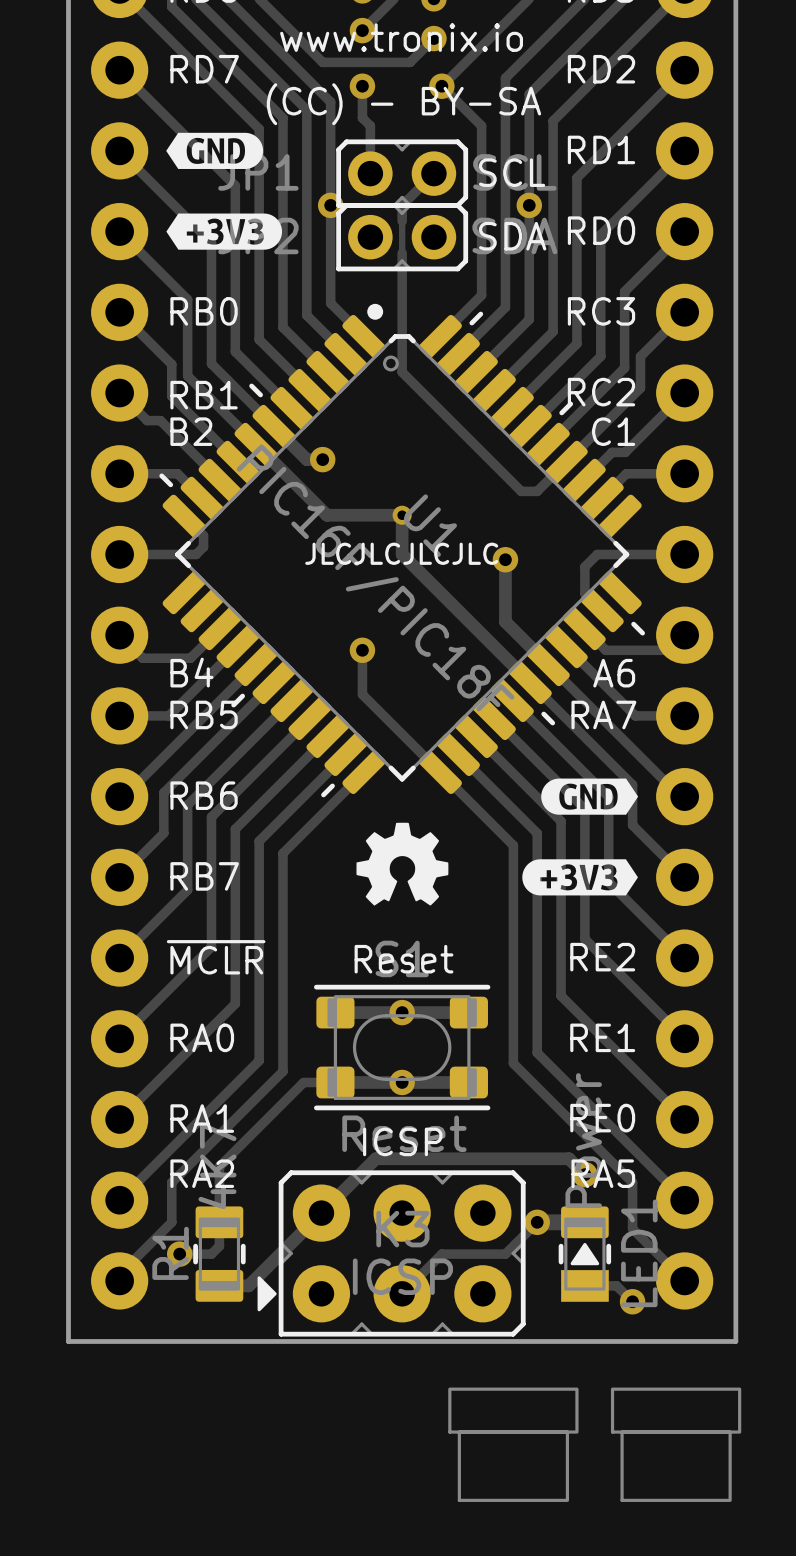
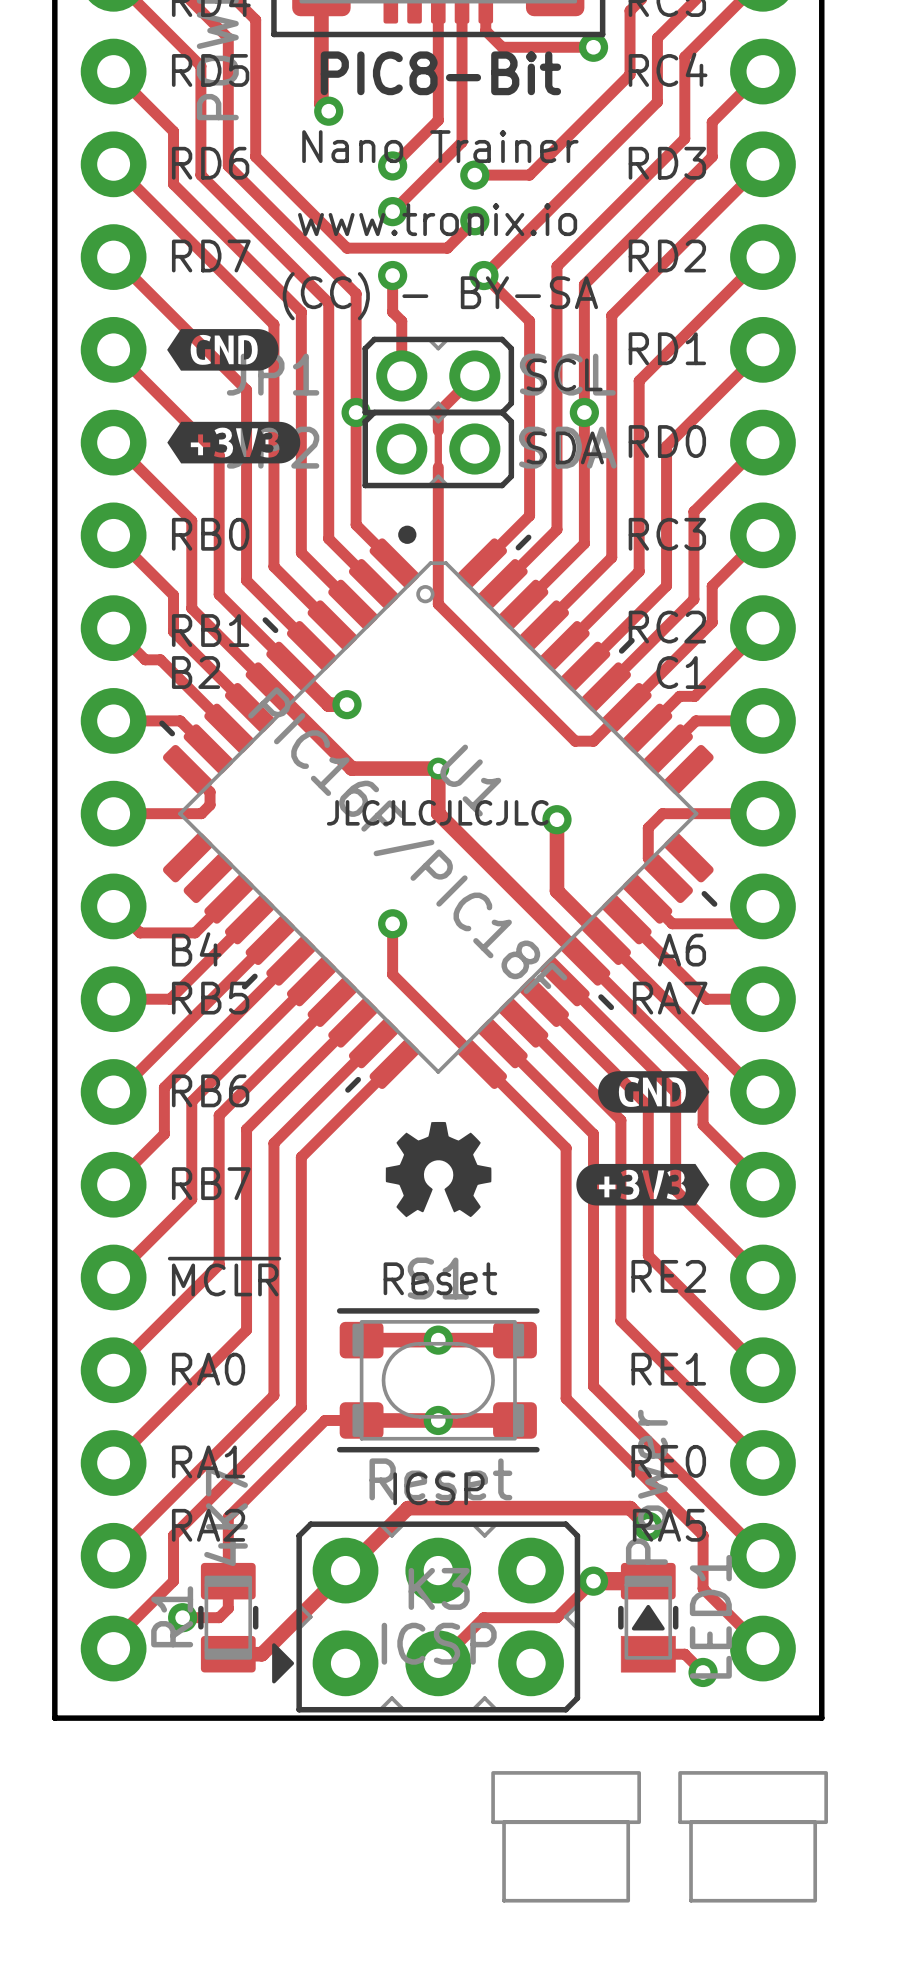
U1 footprint: [159, 303, 645, 798] -> [159, 525, 718, 1093]

